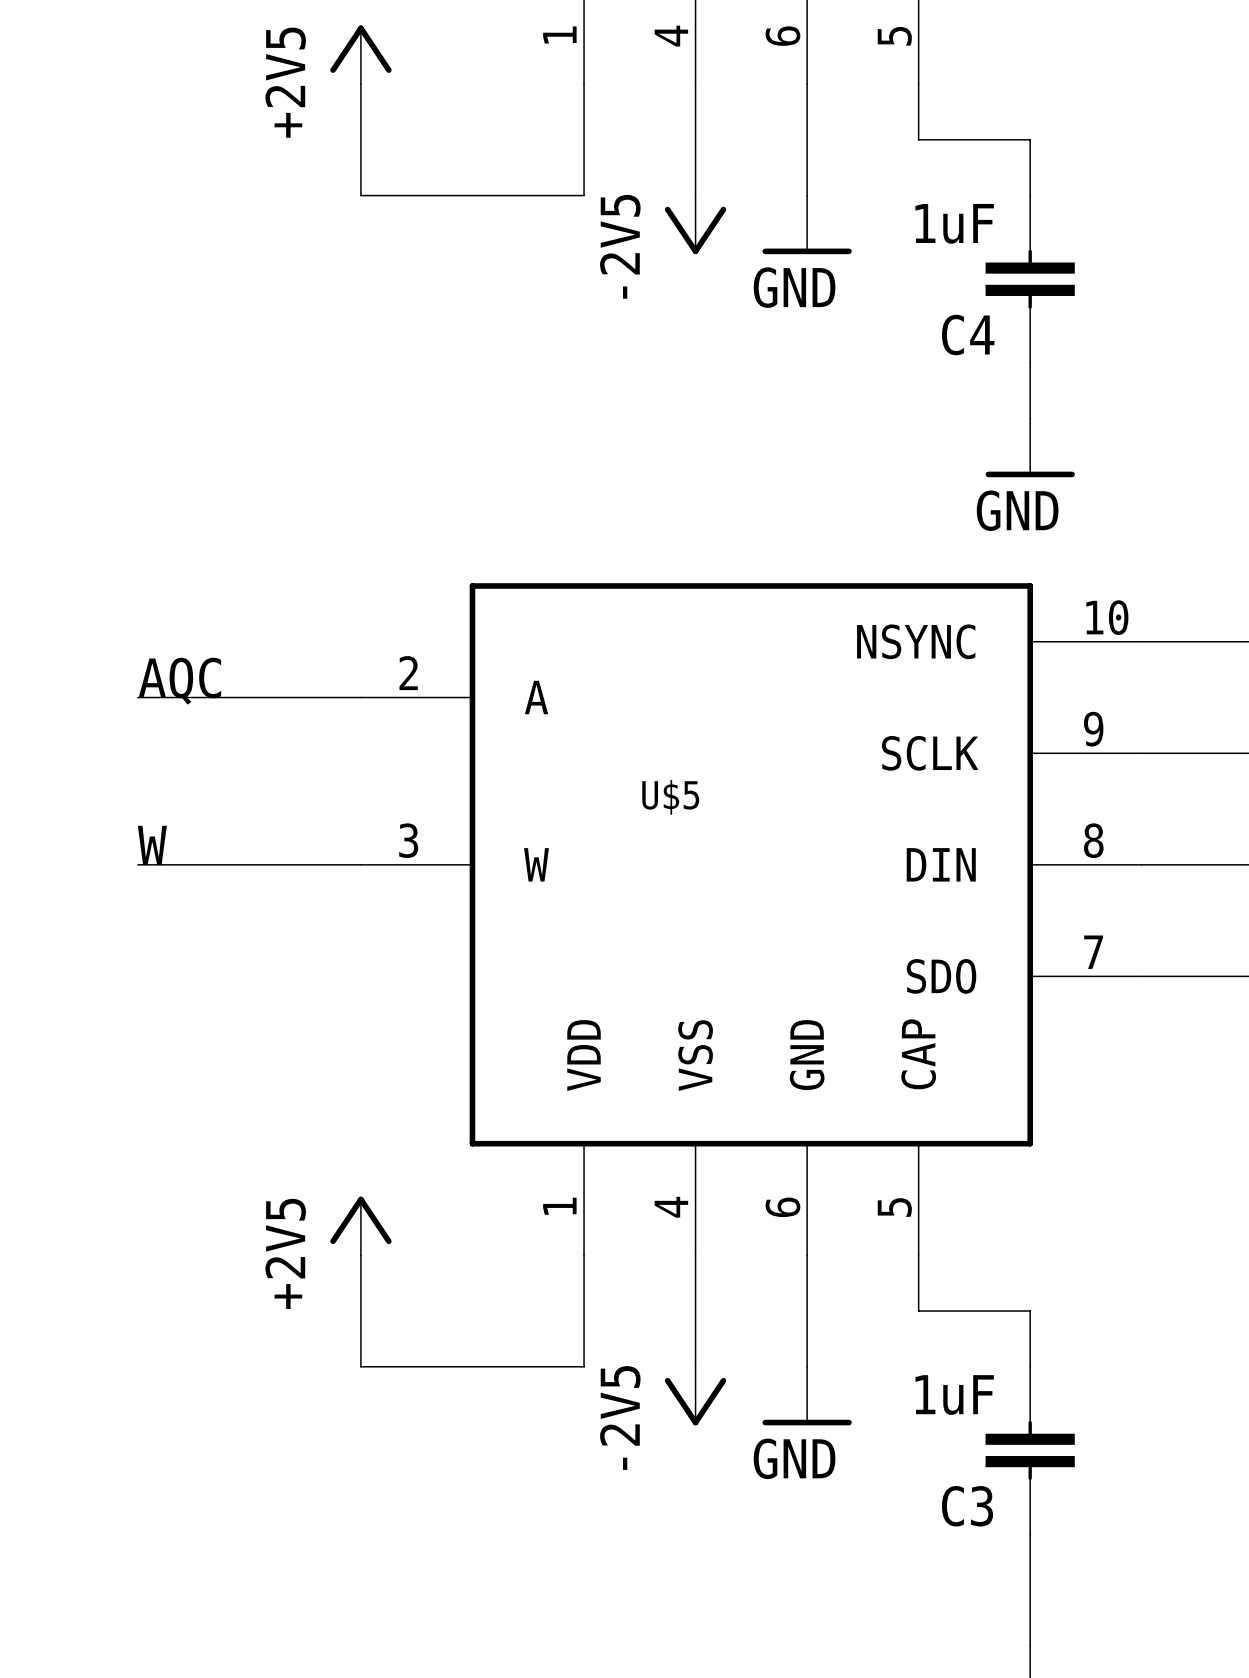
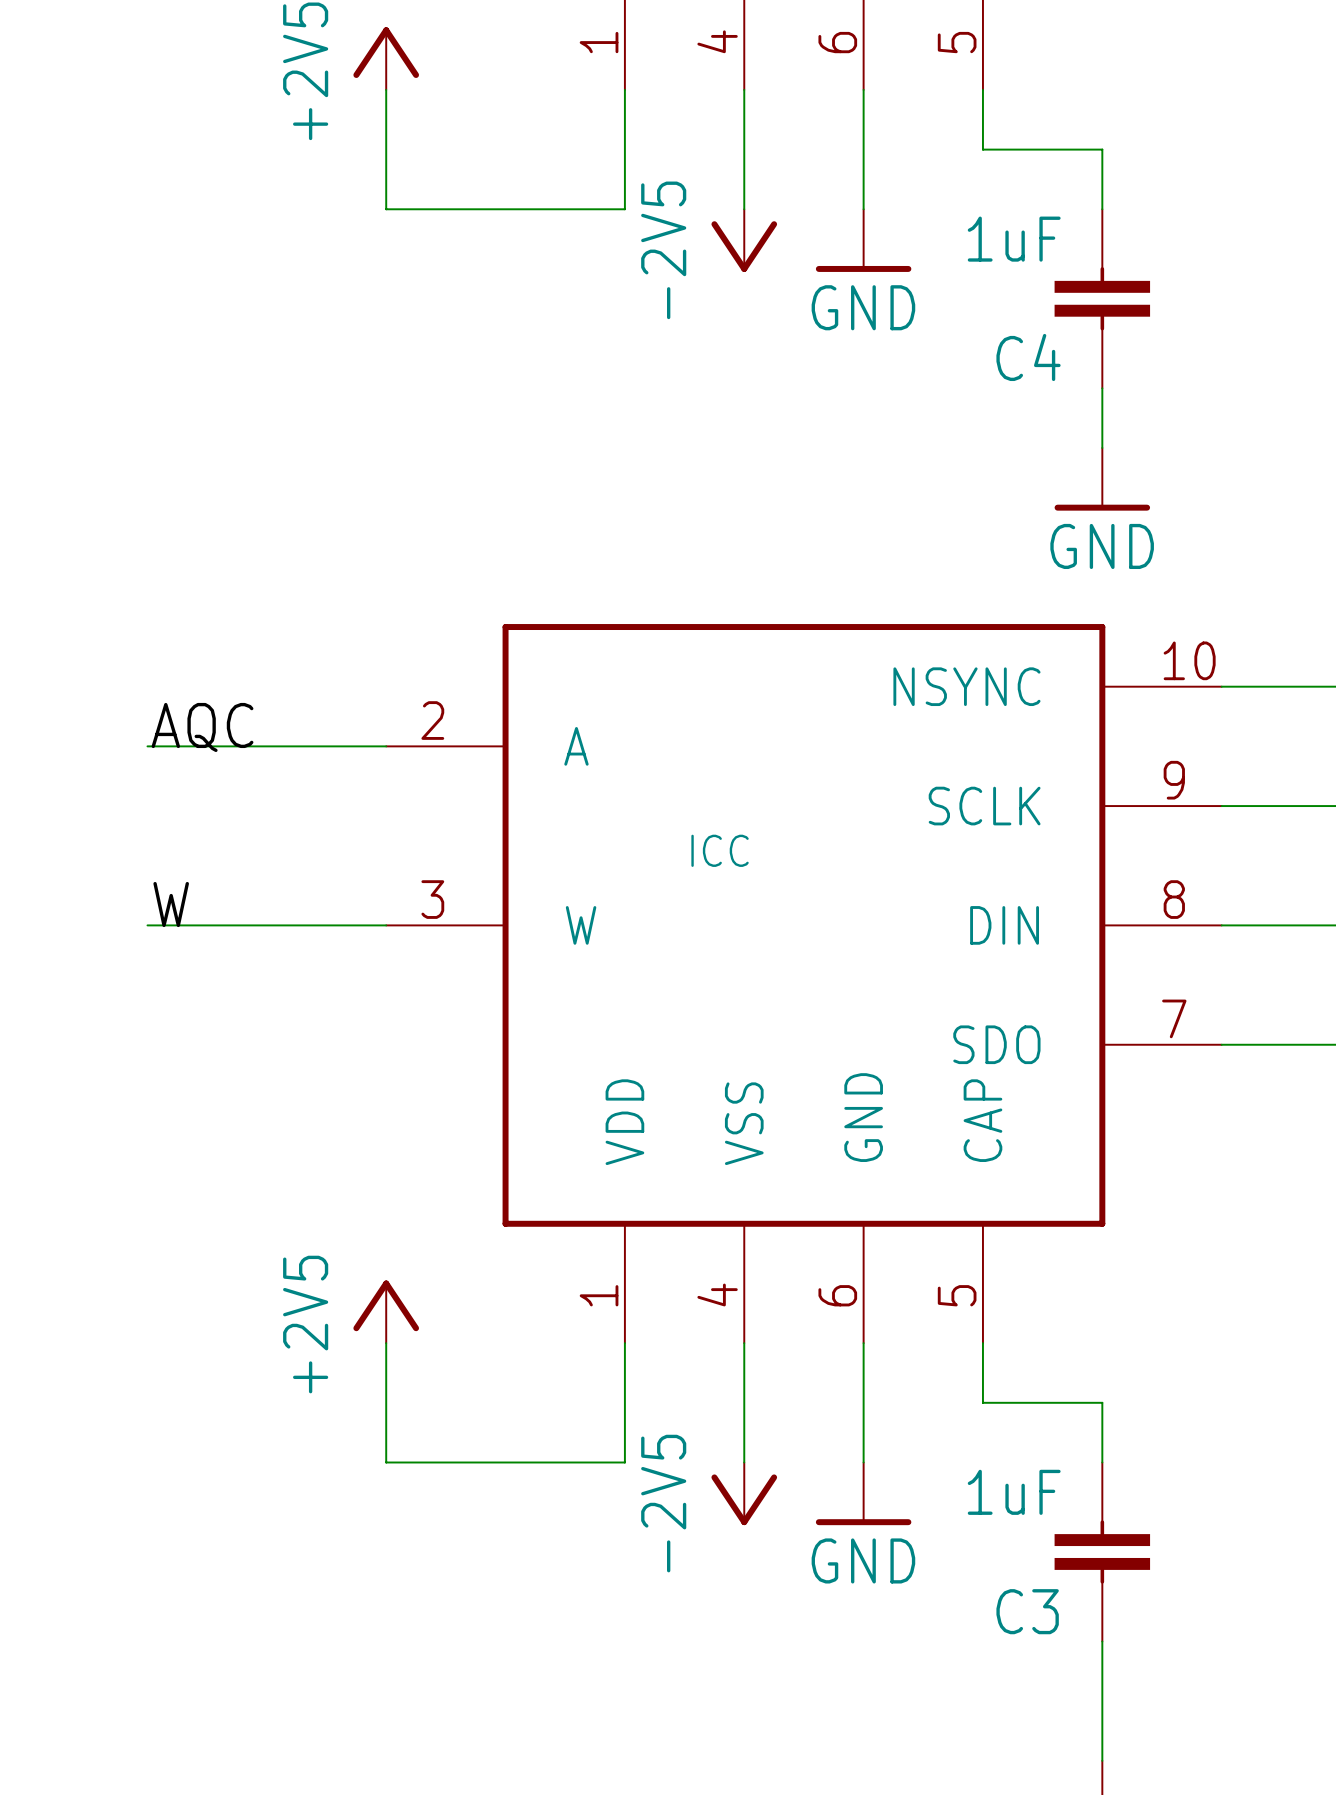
U$5 name: U$5 (670, 797) -> ICC (720, 850)

